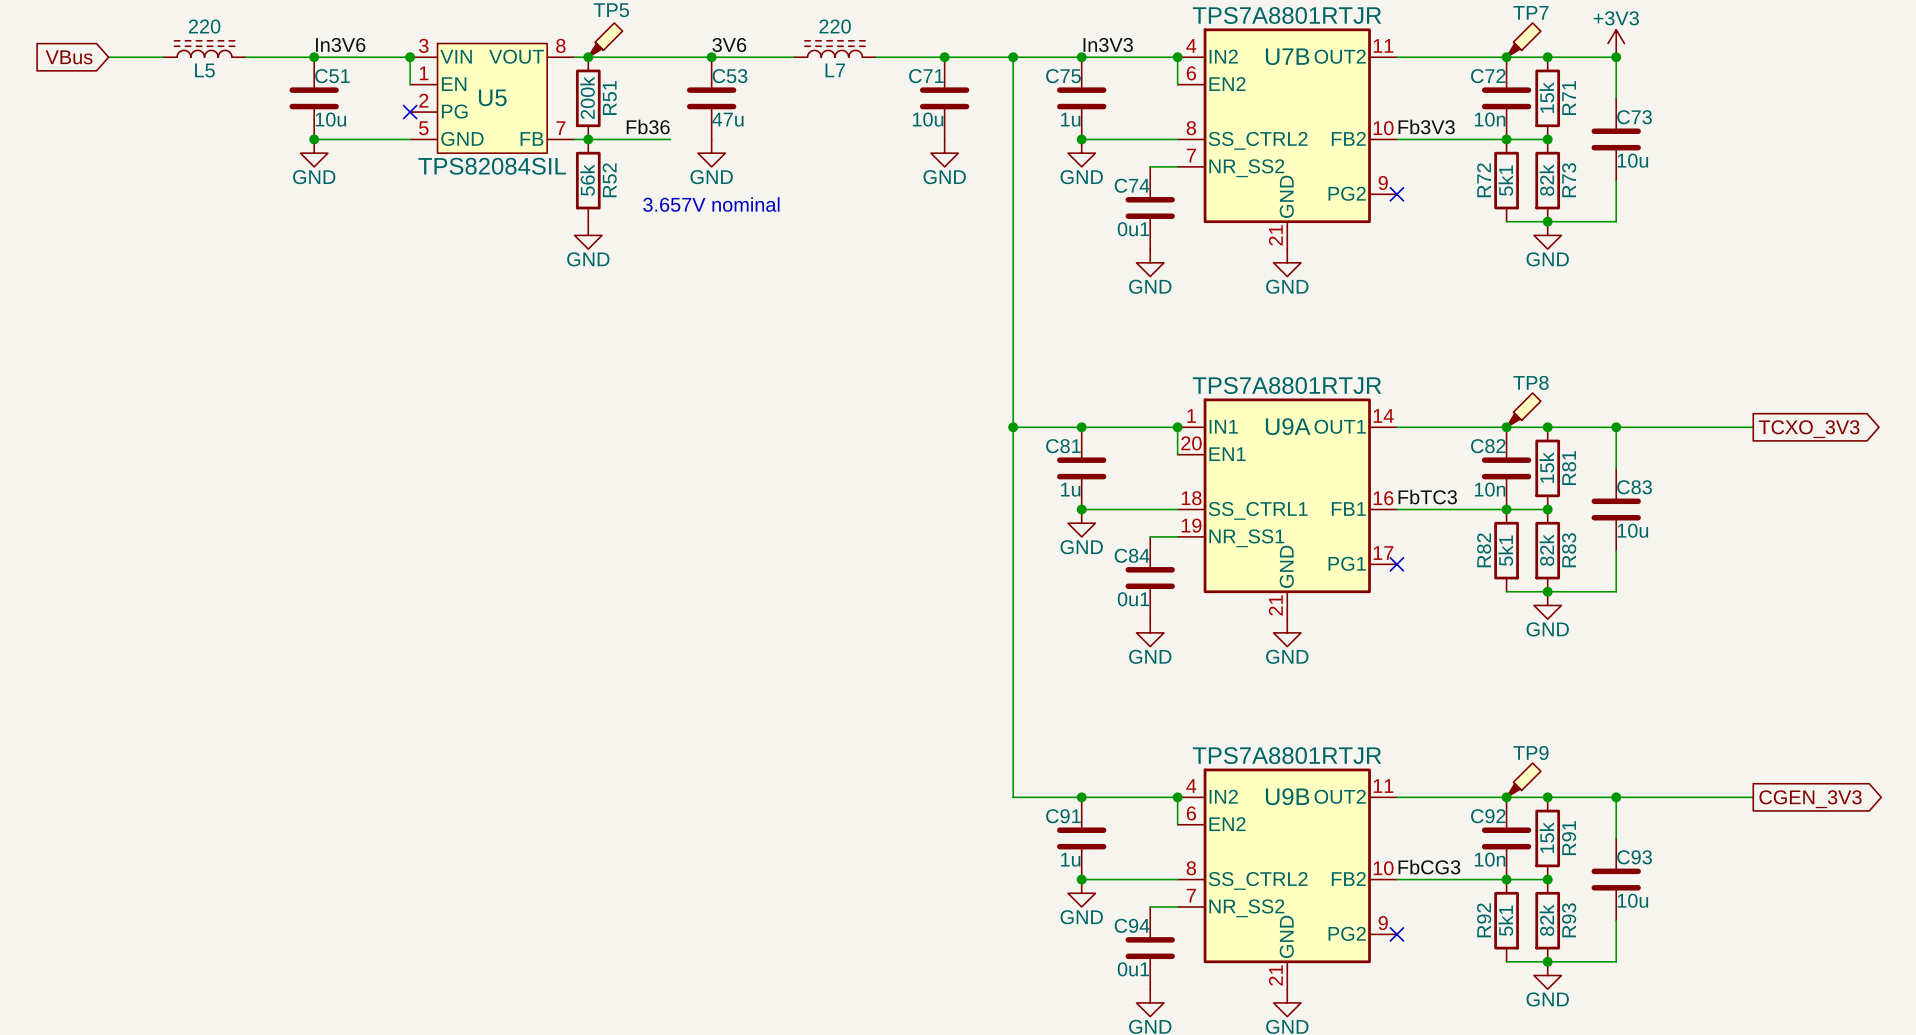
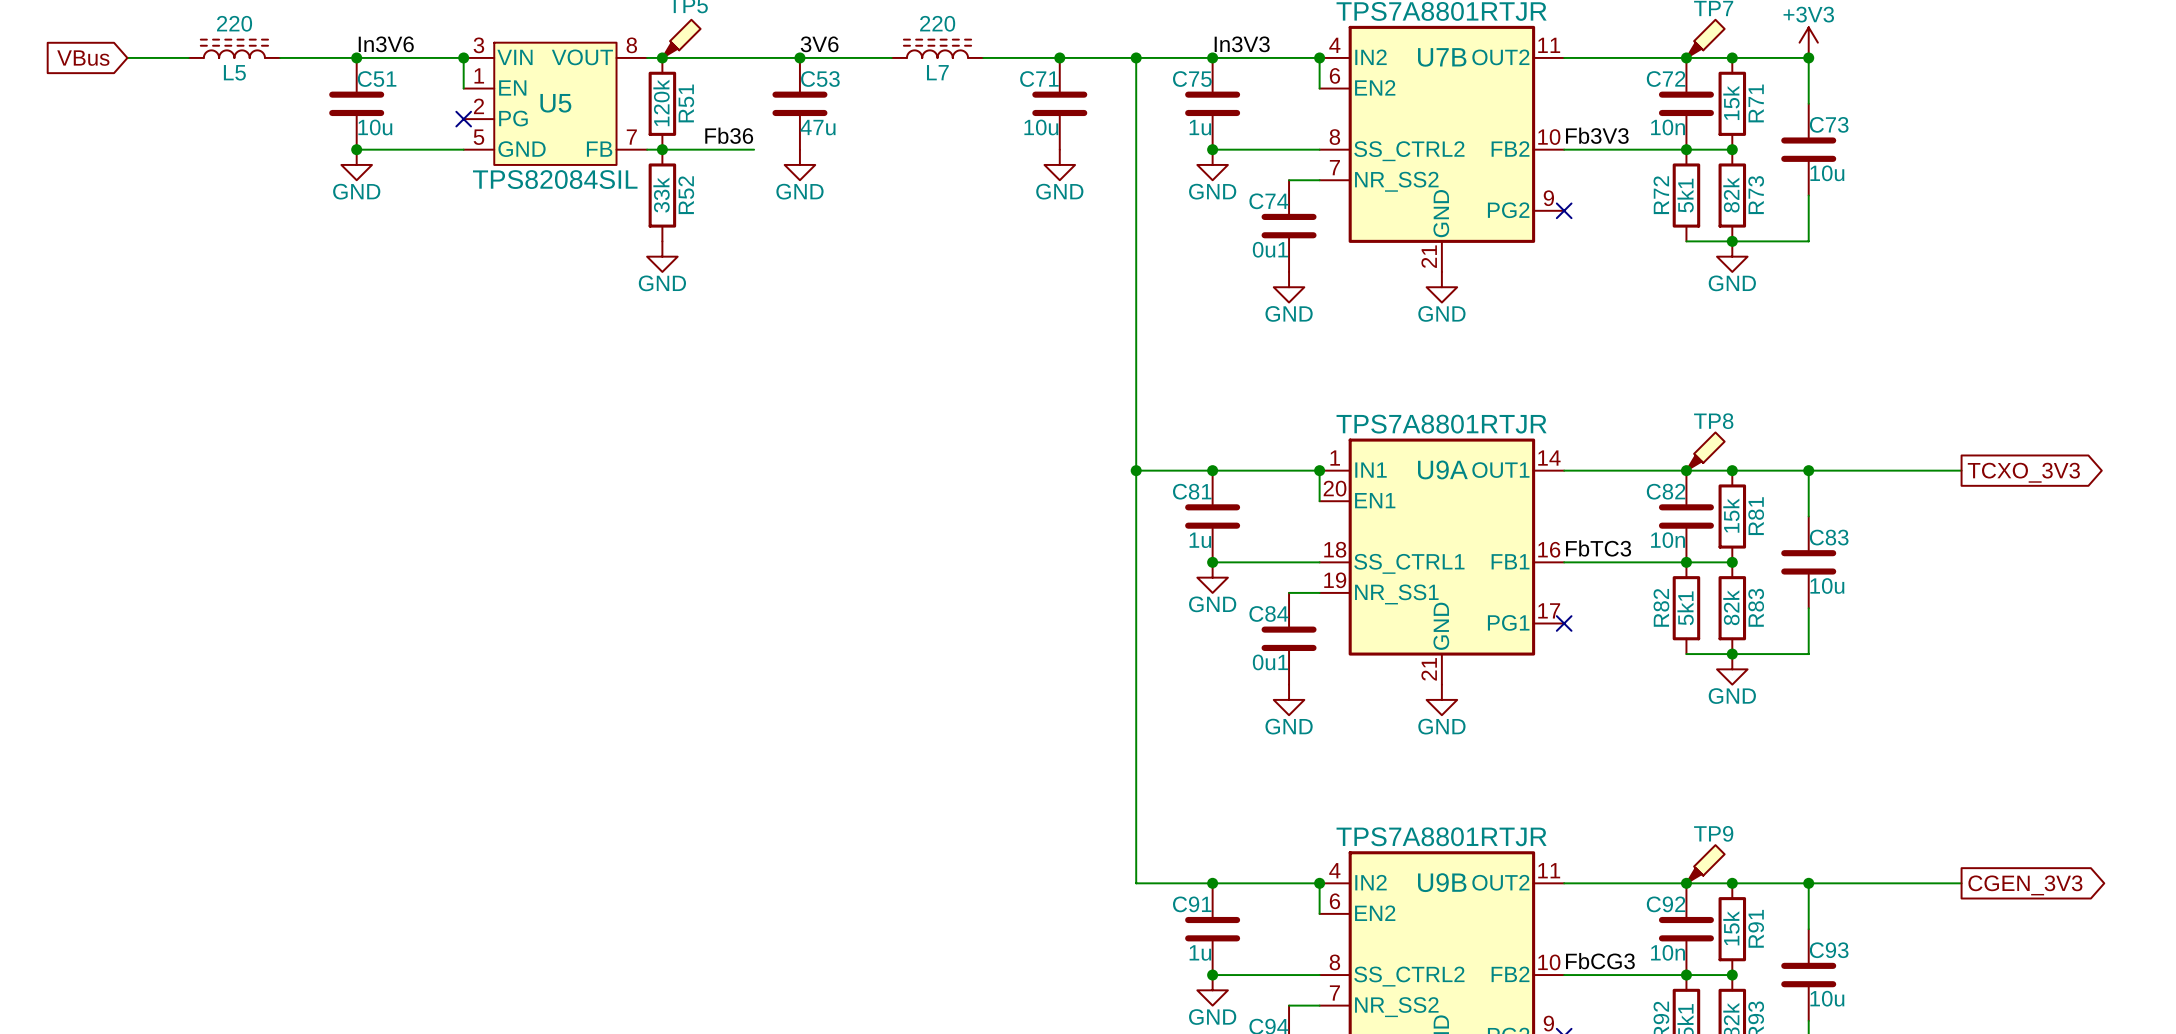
R51 value: 200k (587, 97) -> 120k (661, 102)
R52 value: 56k (587, 180) -> 33k (661, 195)
text: 3.657V nominal (711, 204) -> none

